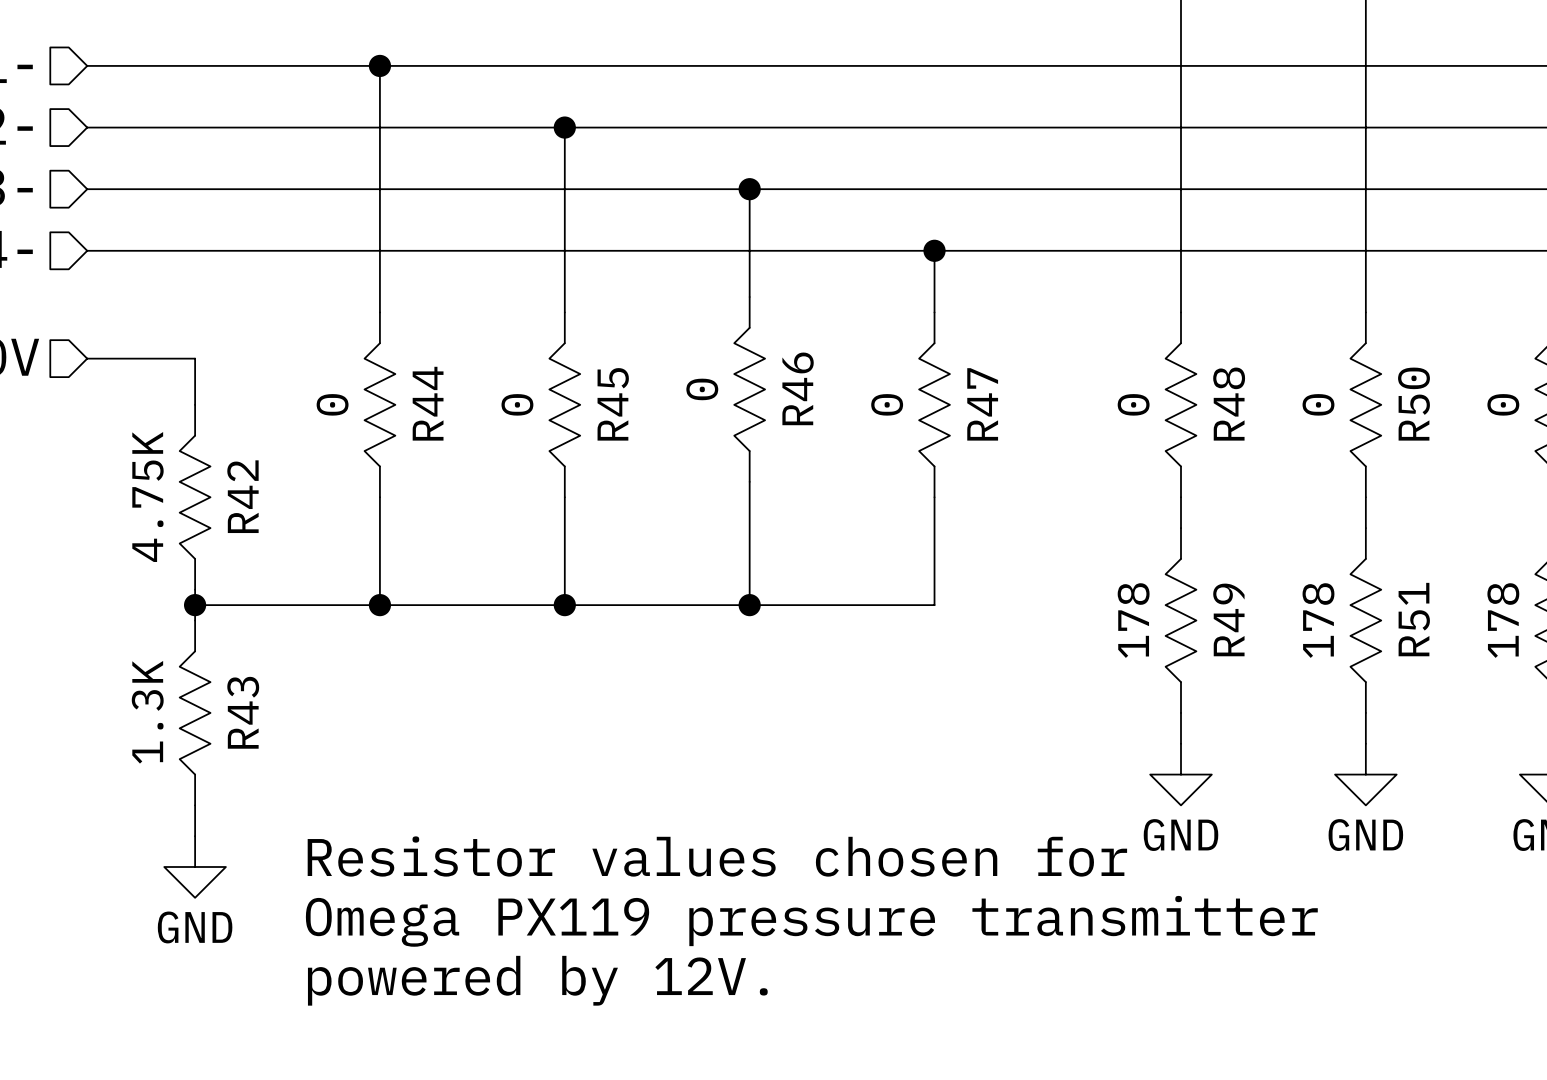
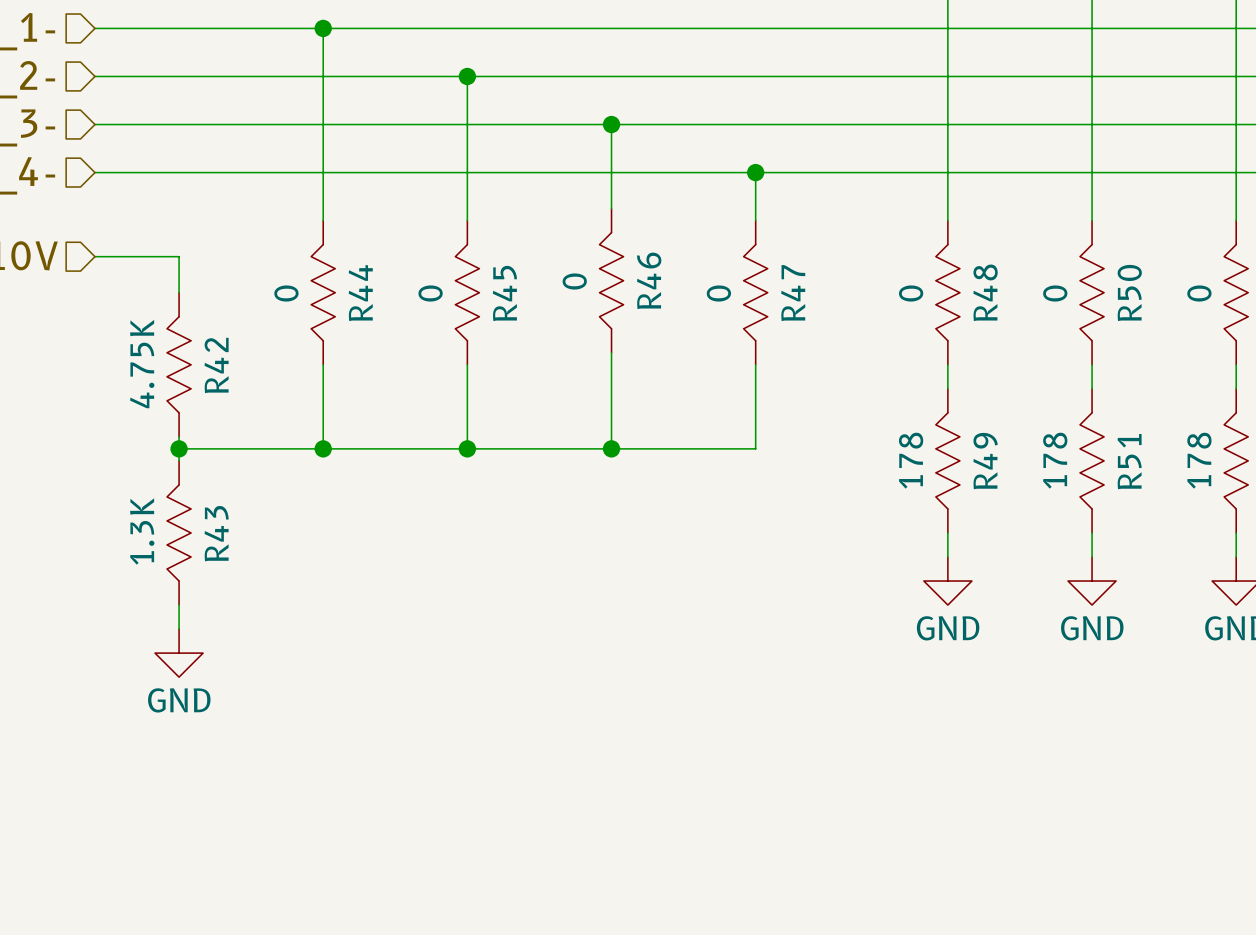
text: Resistor values chosen for (717, 856) -> none
text: Omega PX119 pressure transmitter (811, 921) -> none
text: powered by 12V. (537, 980) -> none

